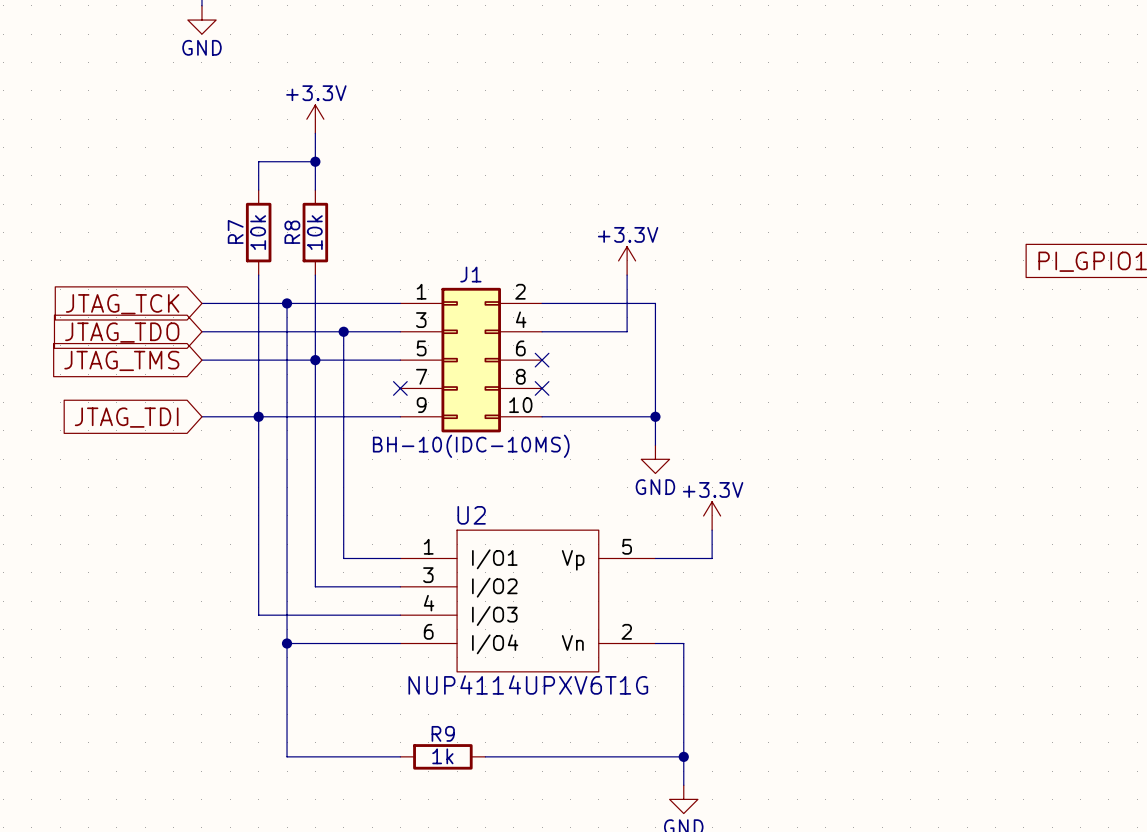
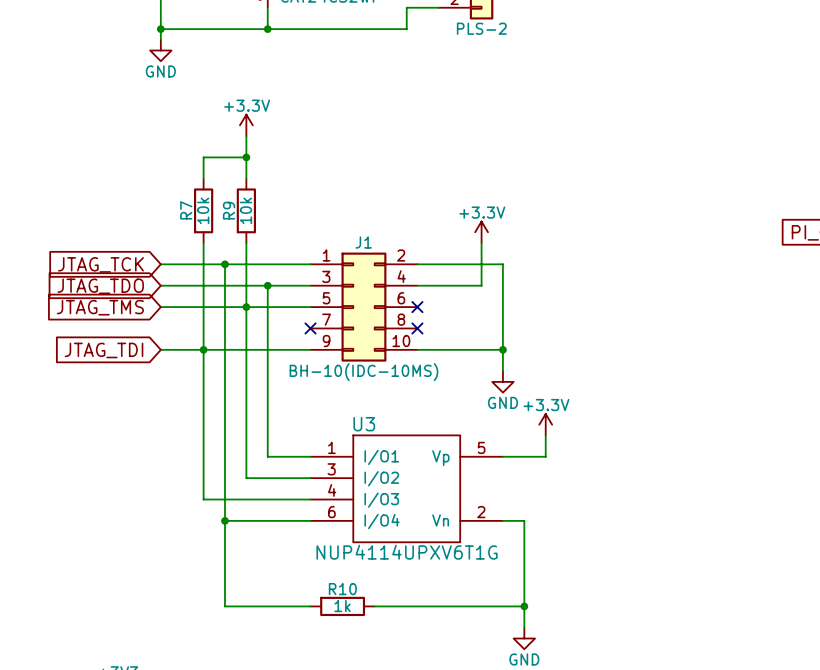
R8 name: R8 (292, 232) -> R9 (229, 210)
U2 name: U2 (471, 515) -> U3 (364, 424)
R9 name: R9 (443, 733) -> R10 (342, 589)

